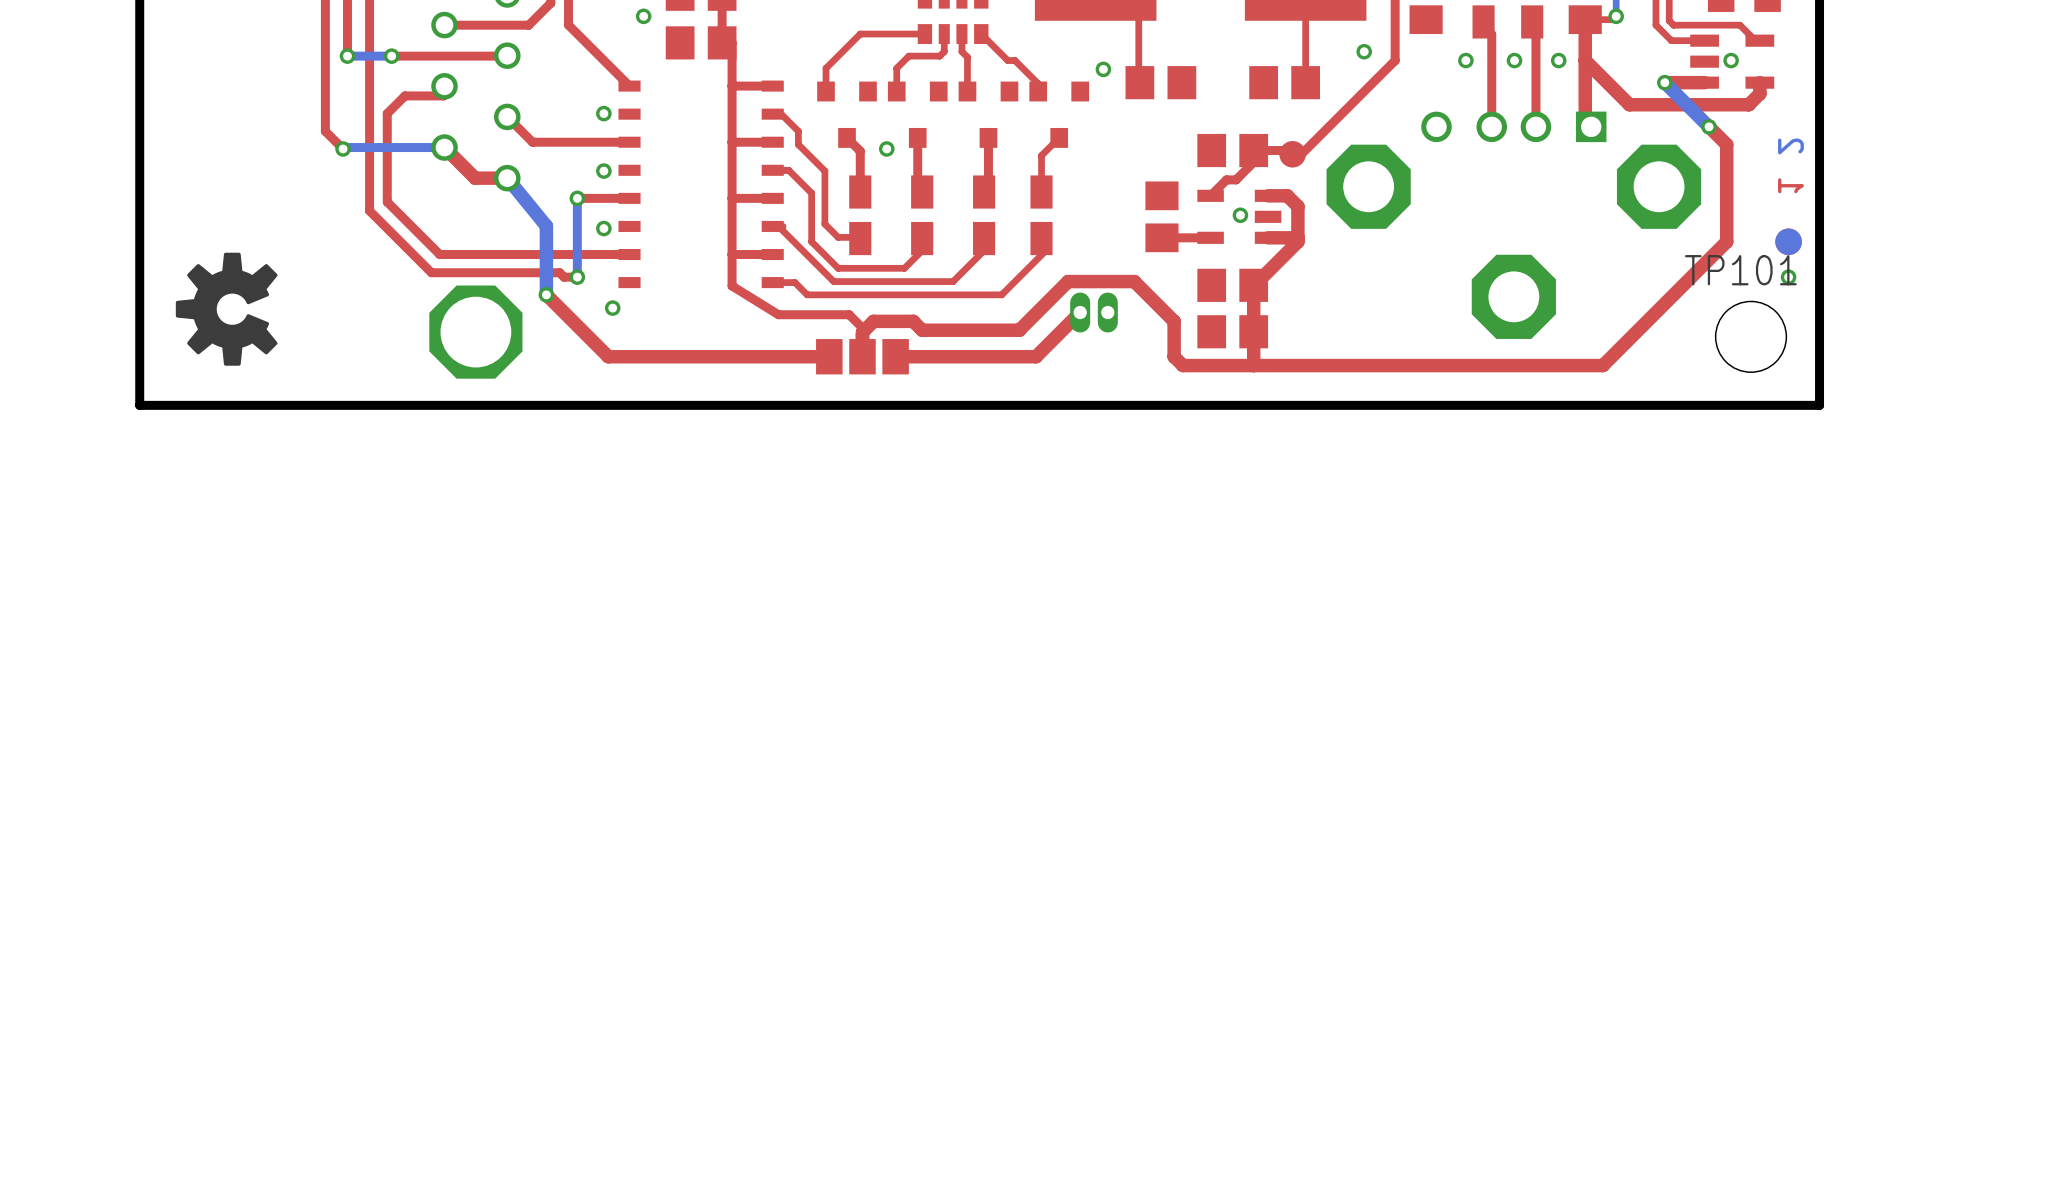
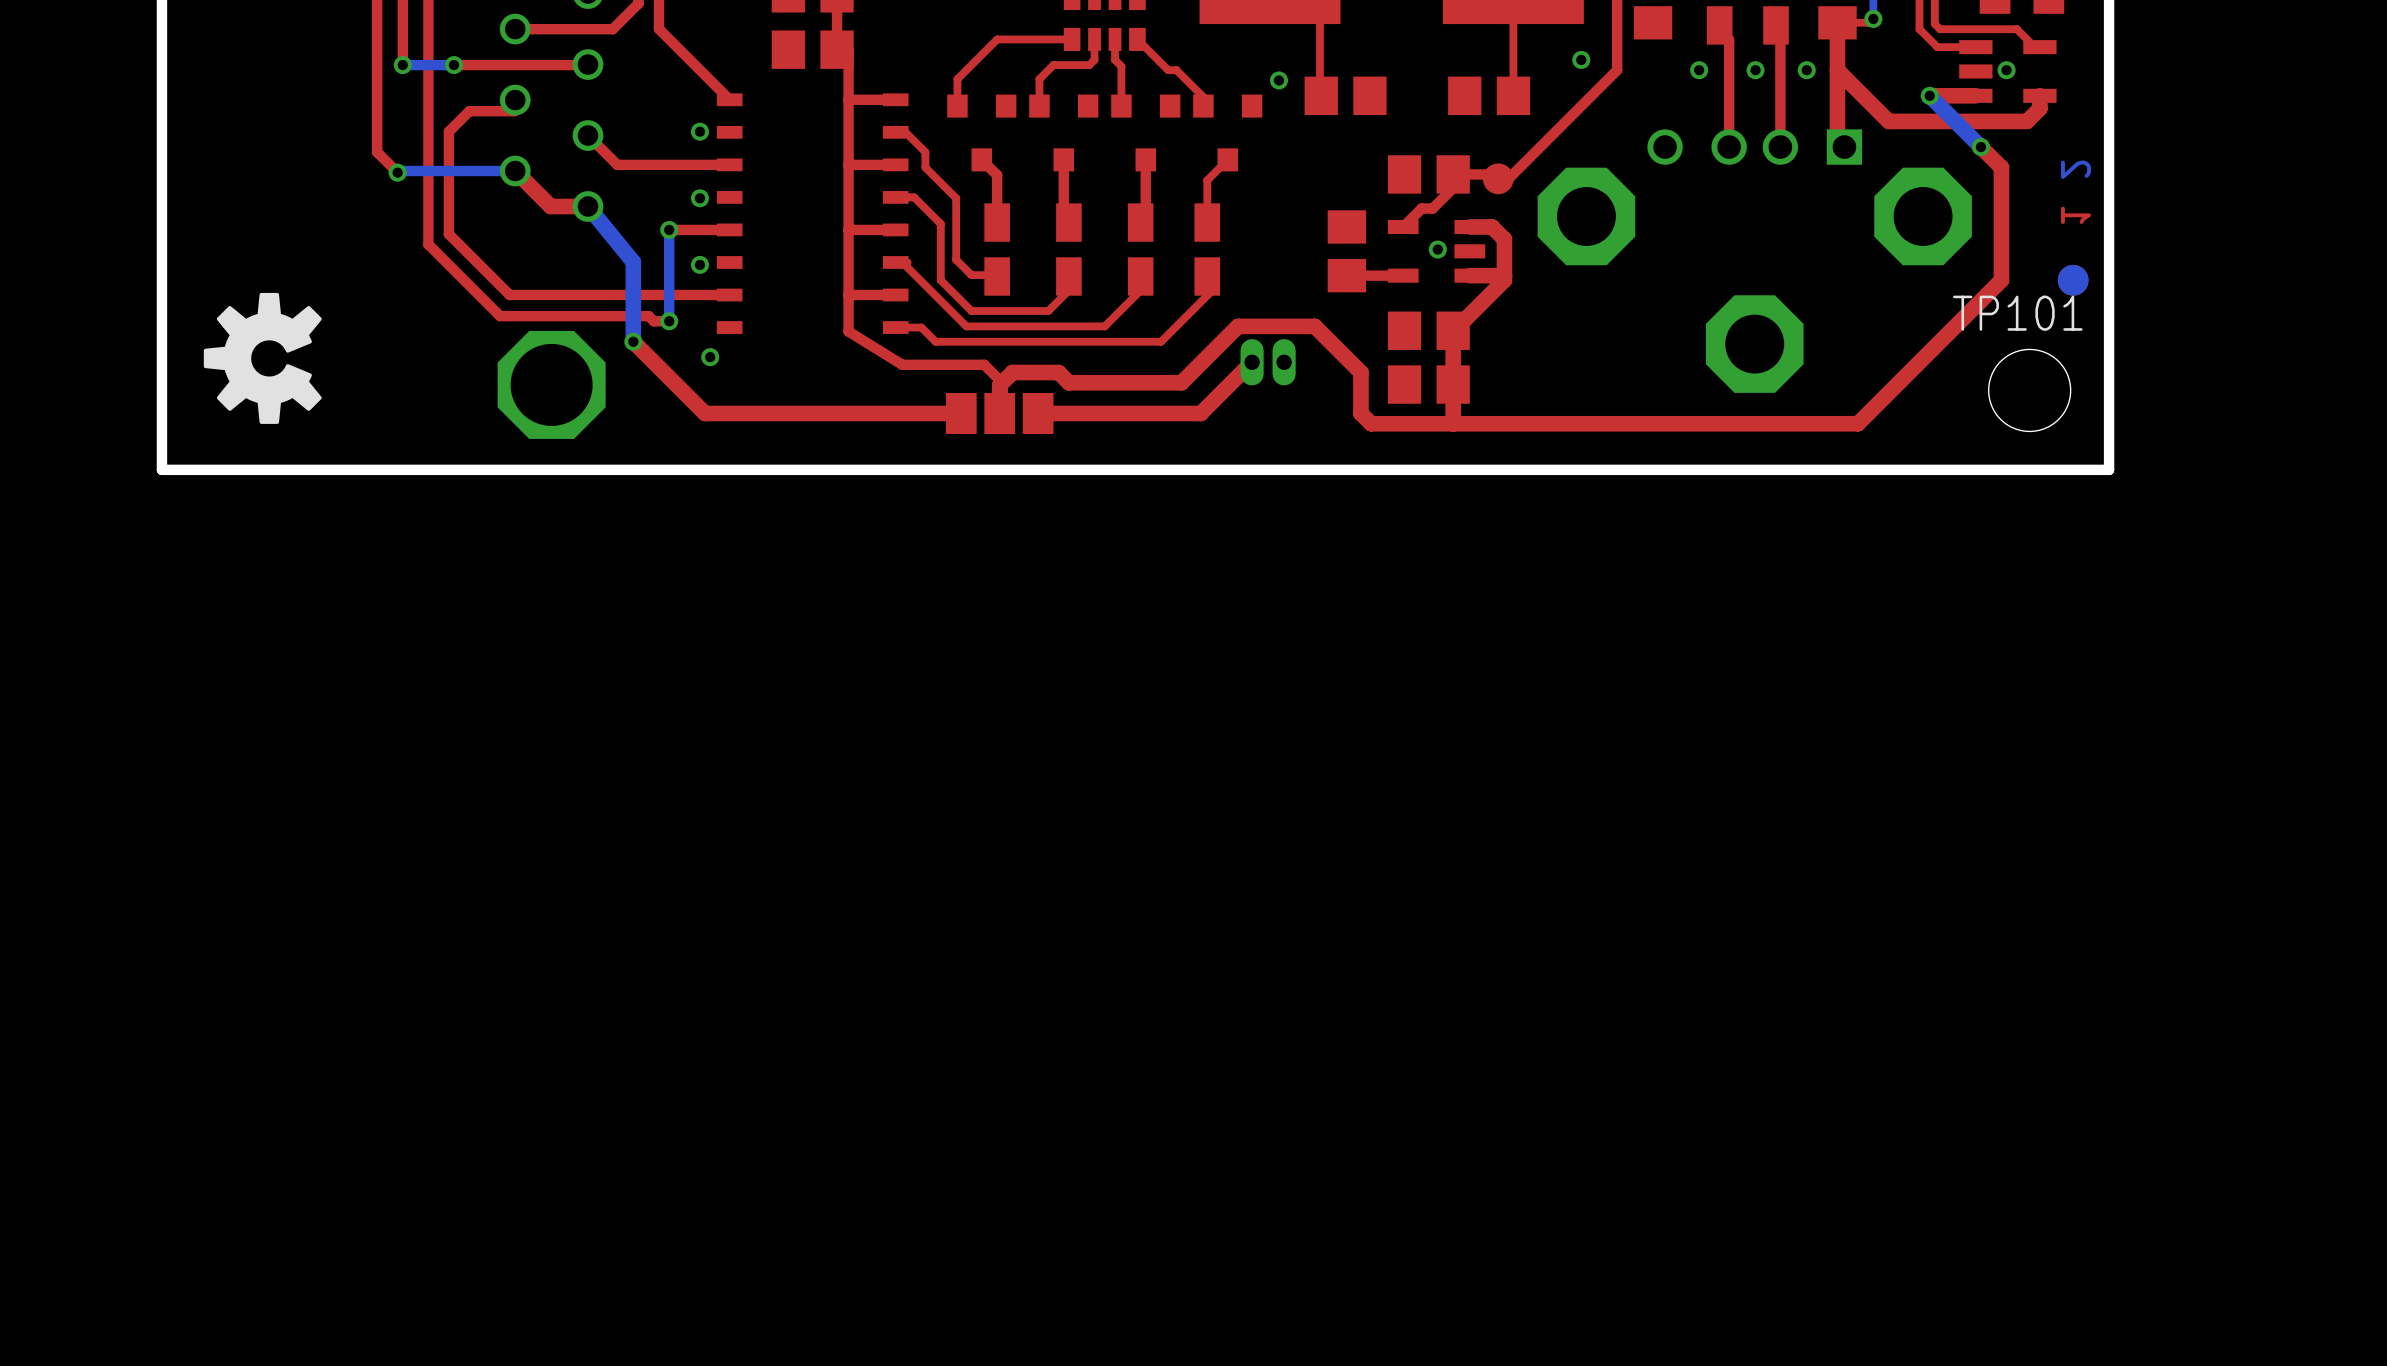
via: (643, 16) -> none
via: (886, 148) -> none
via: (1788, 277) -> none

